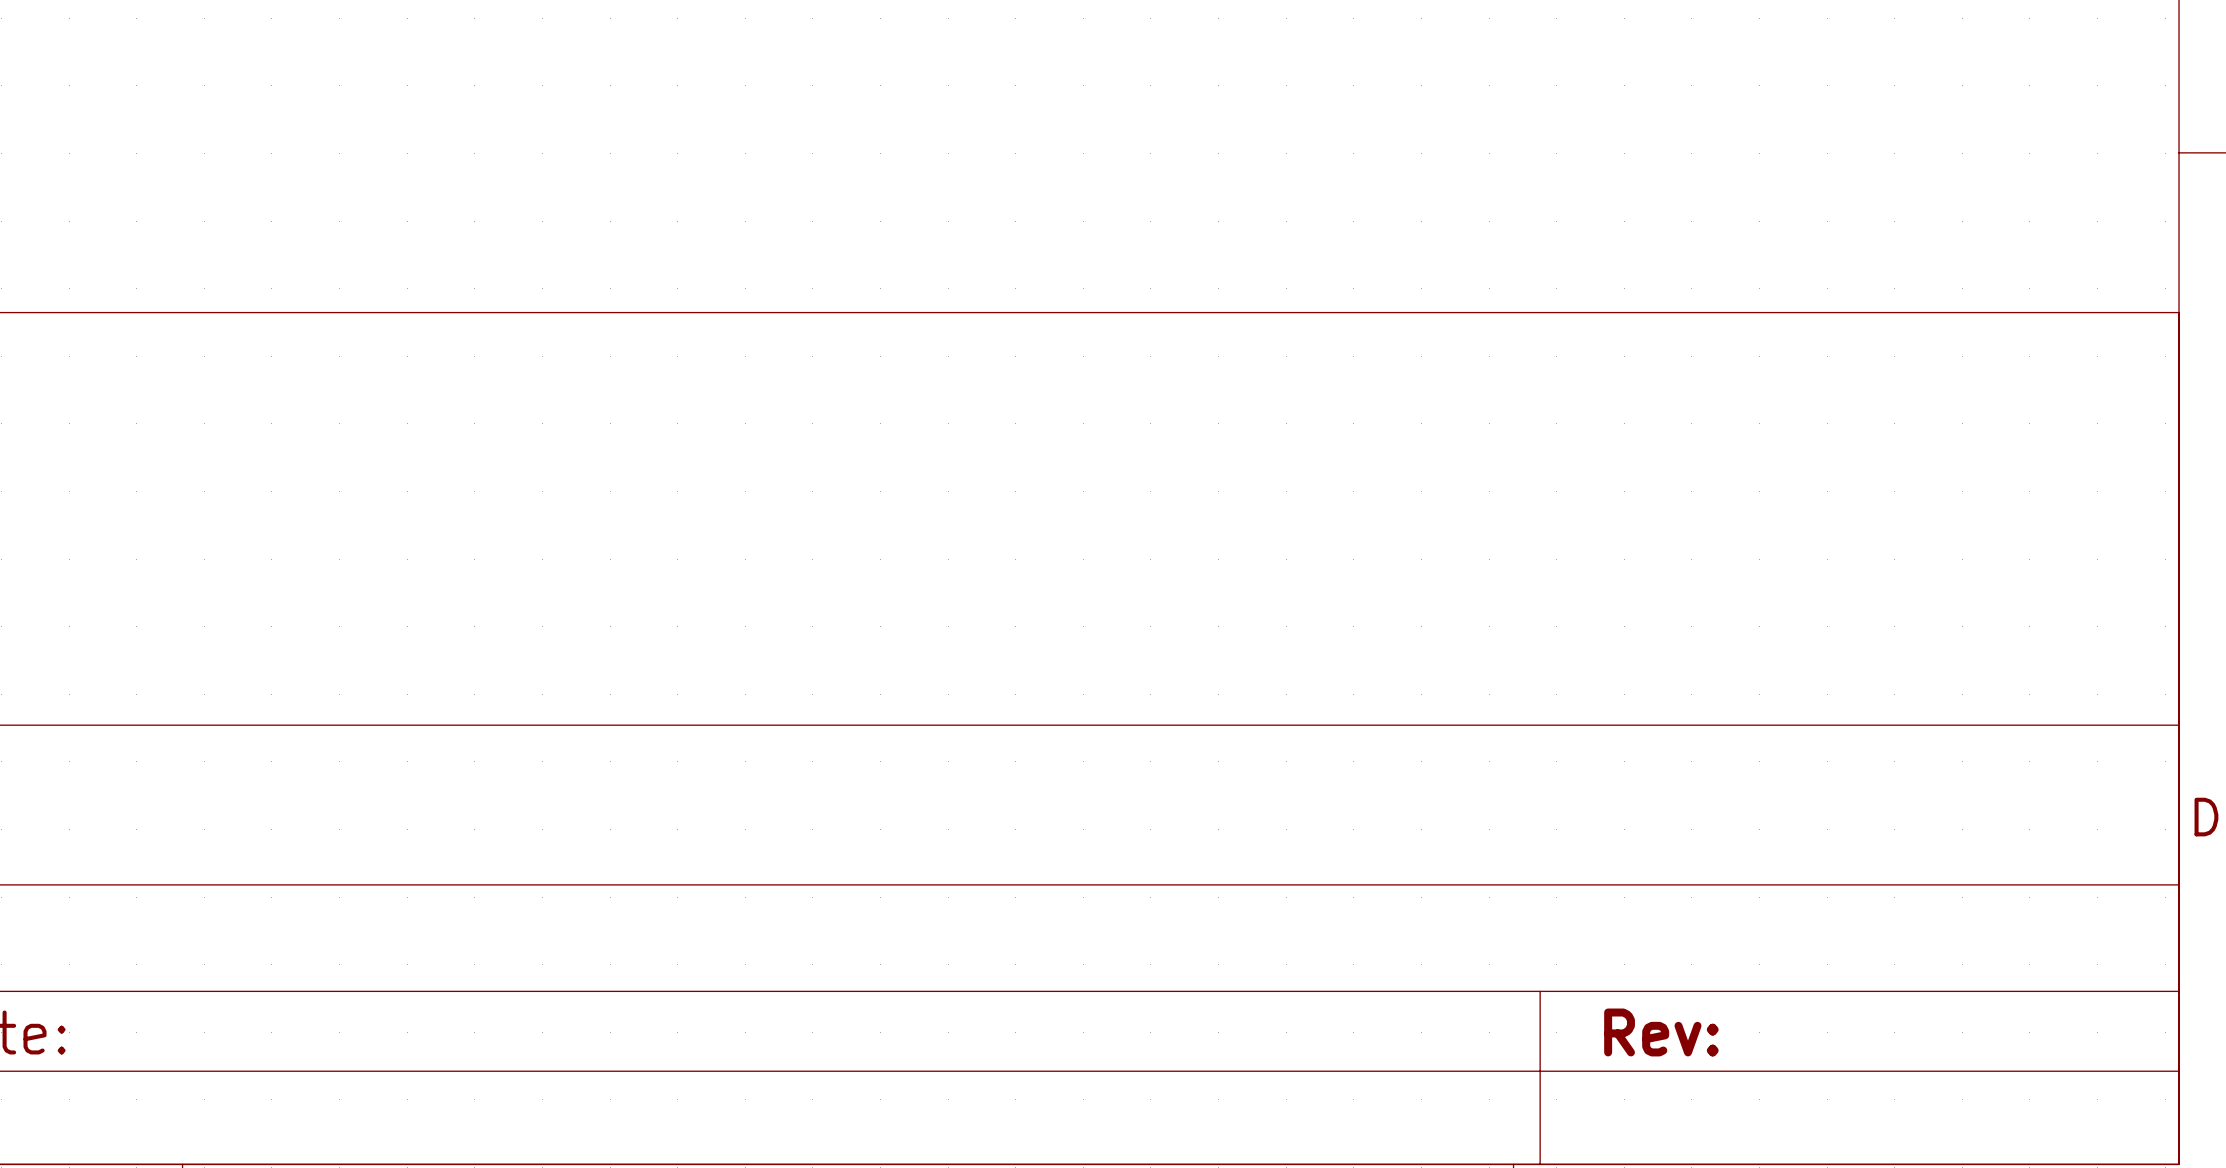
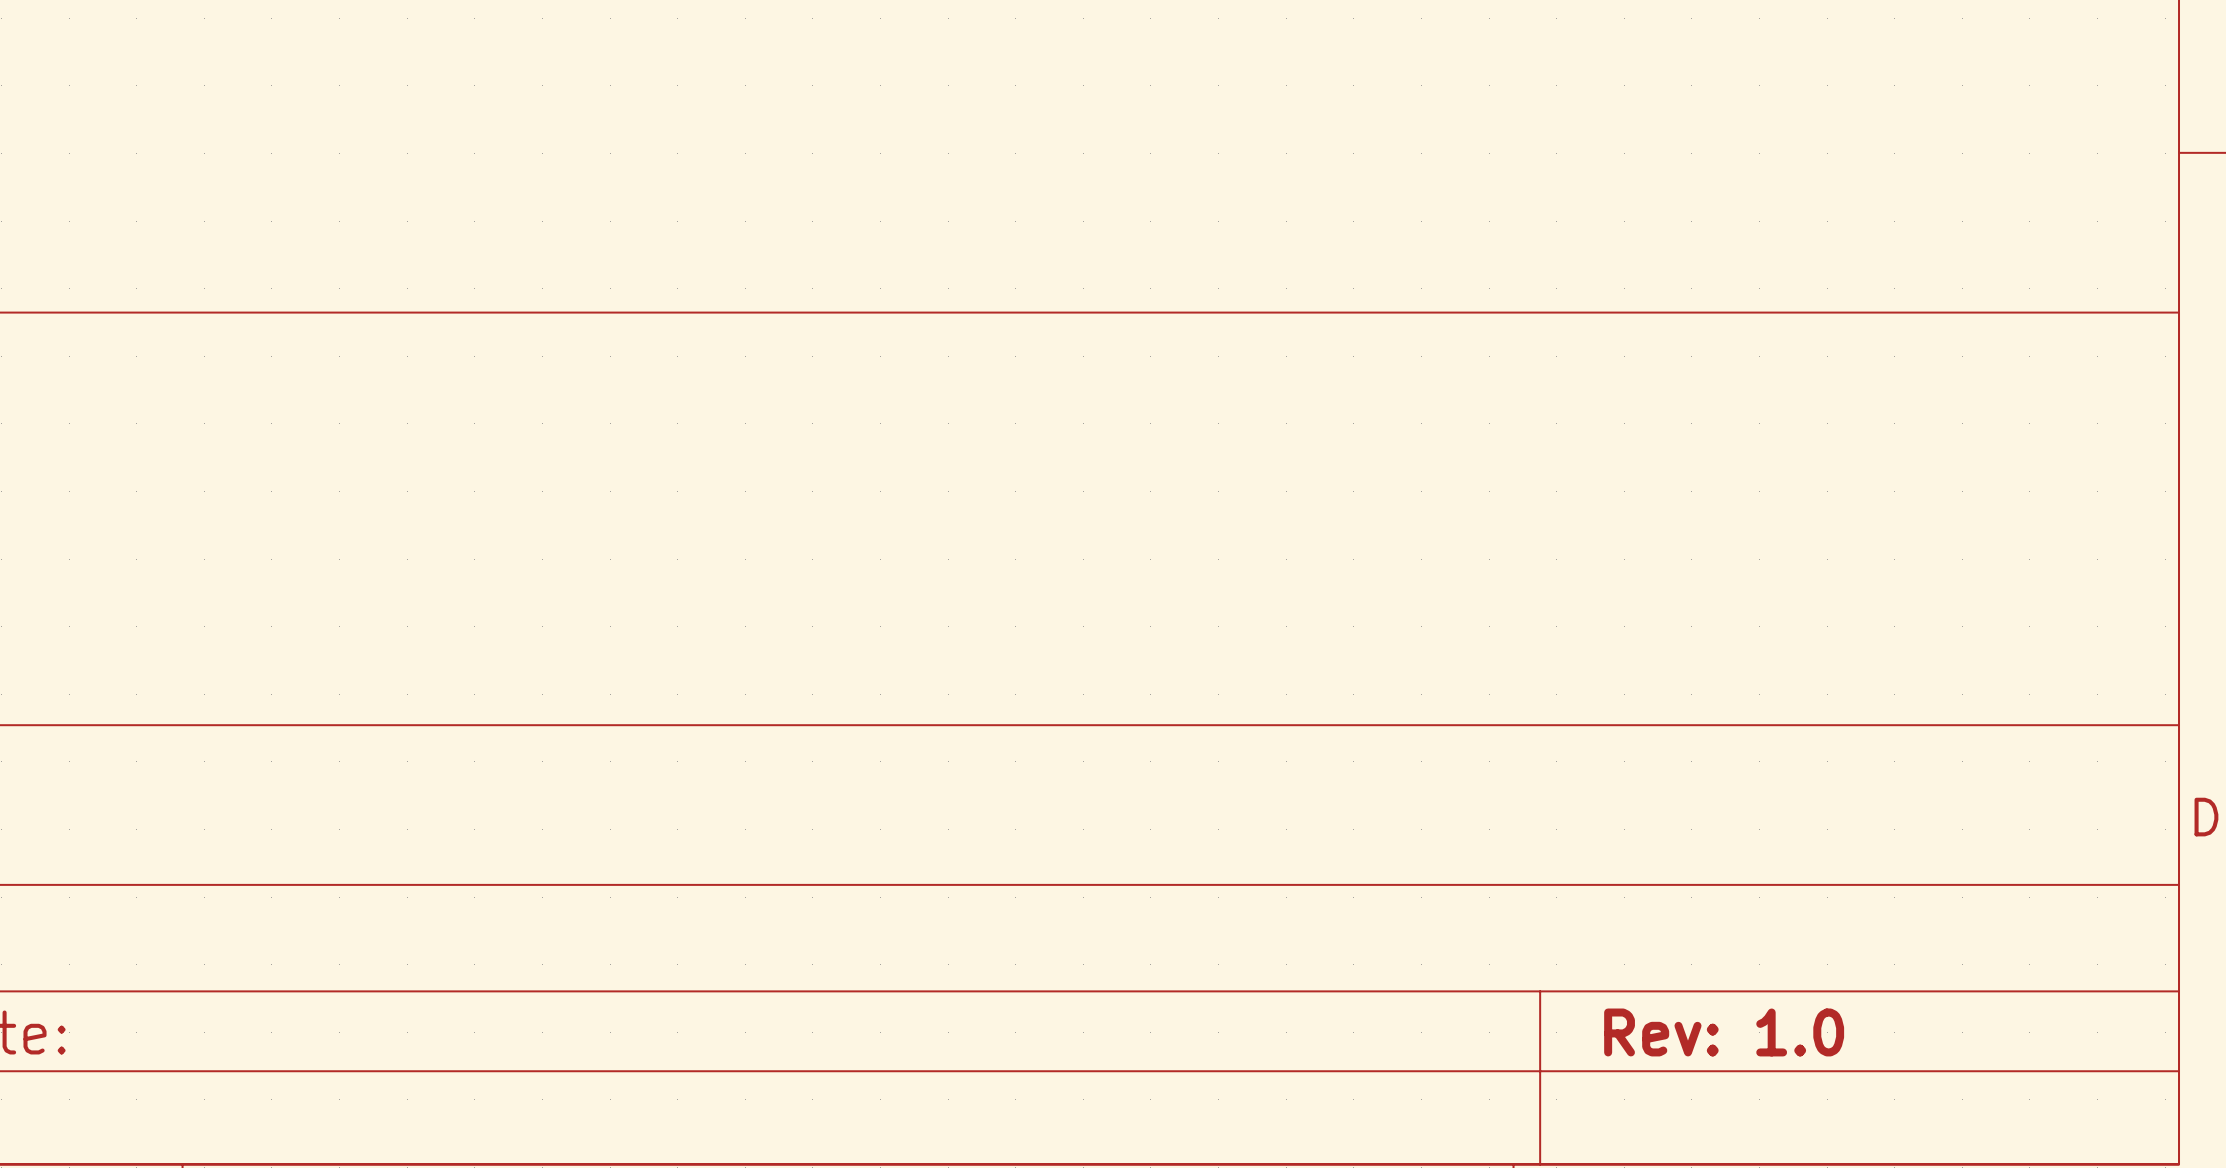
title block: Rev: (1661, 1032) -> Rev: 1.0 (1724, 1032)

